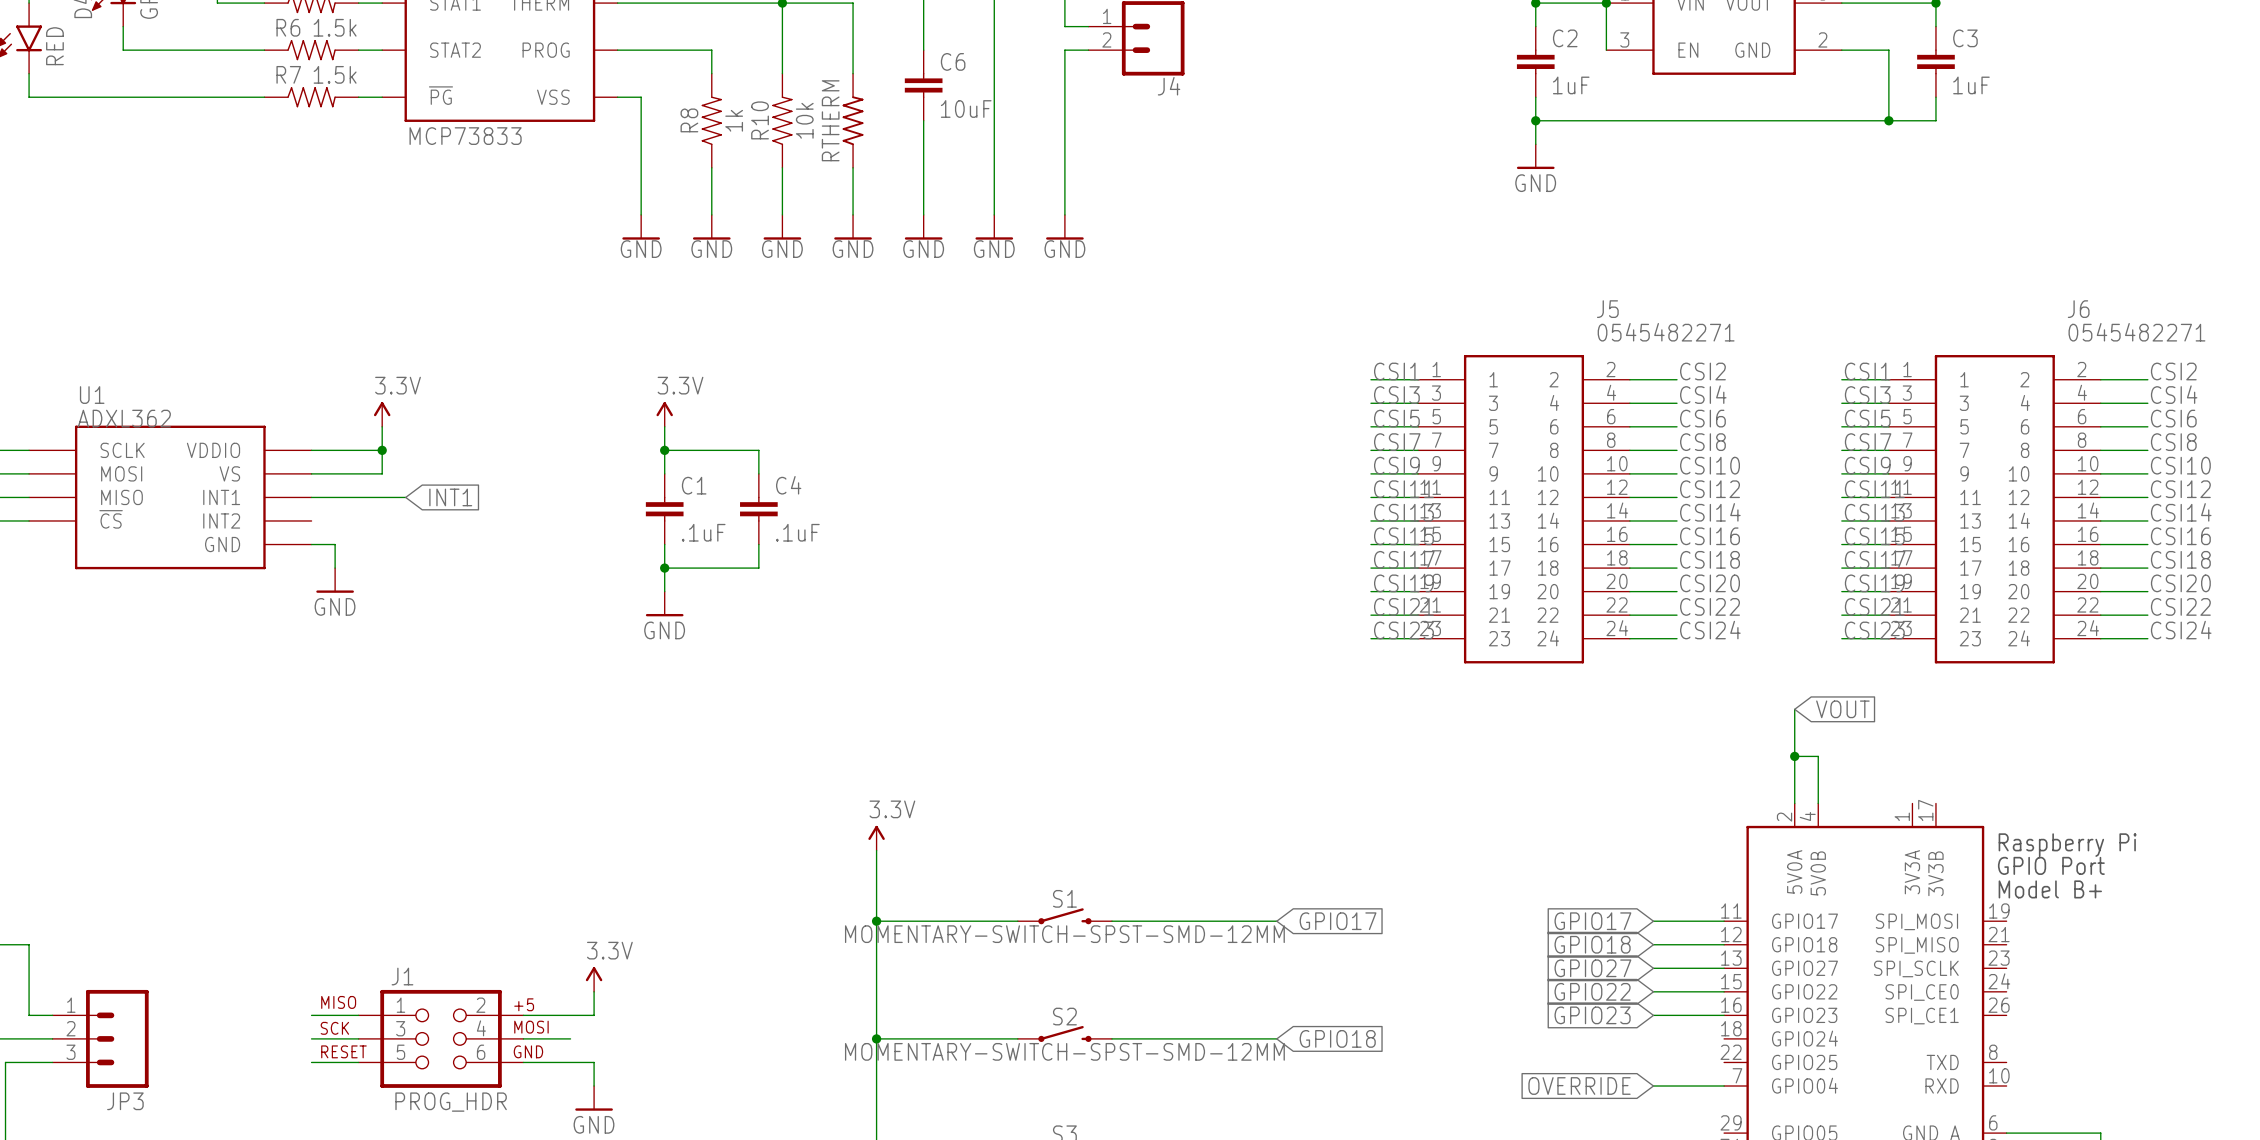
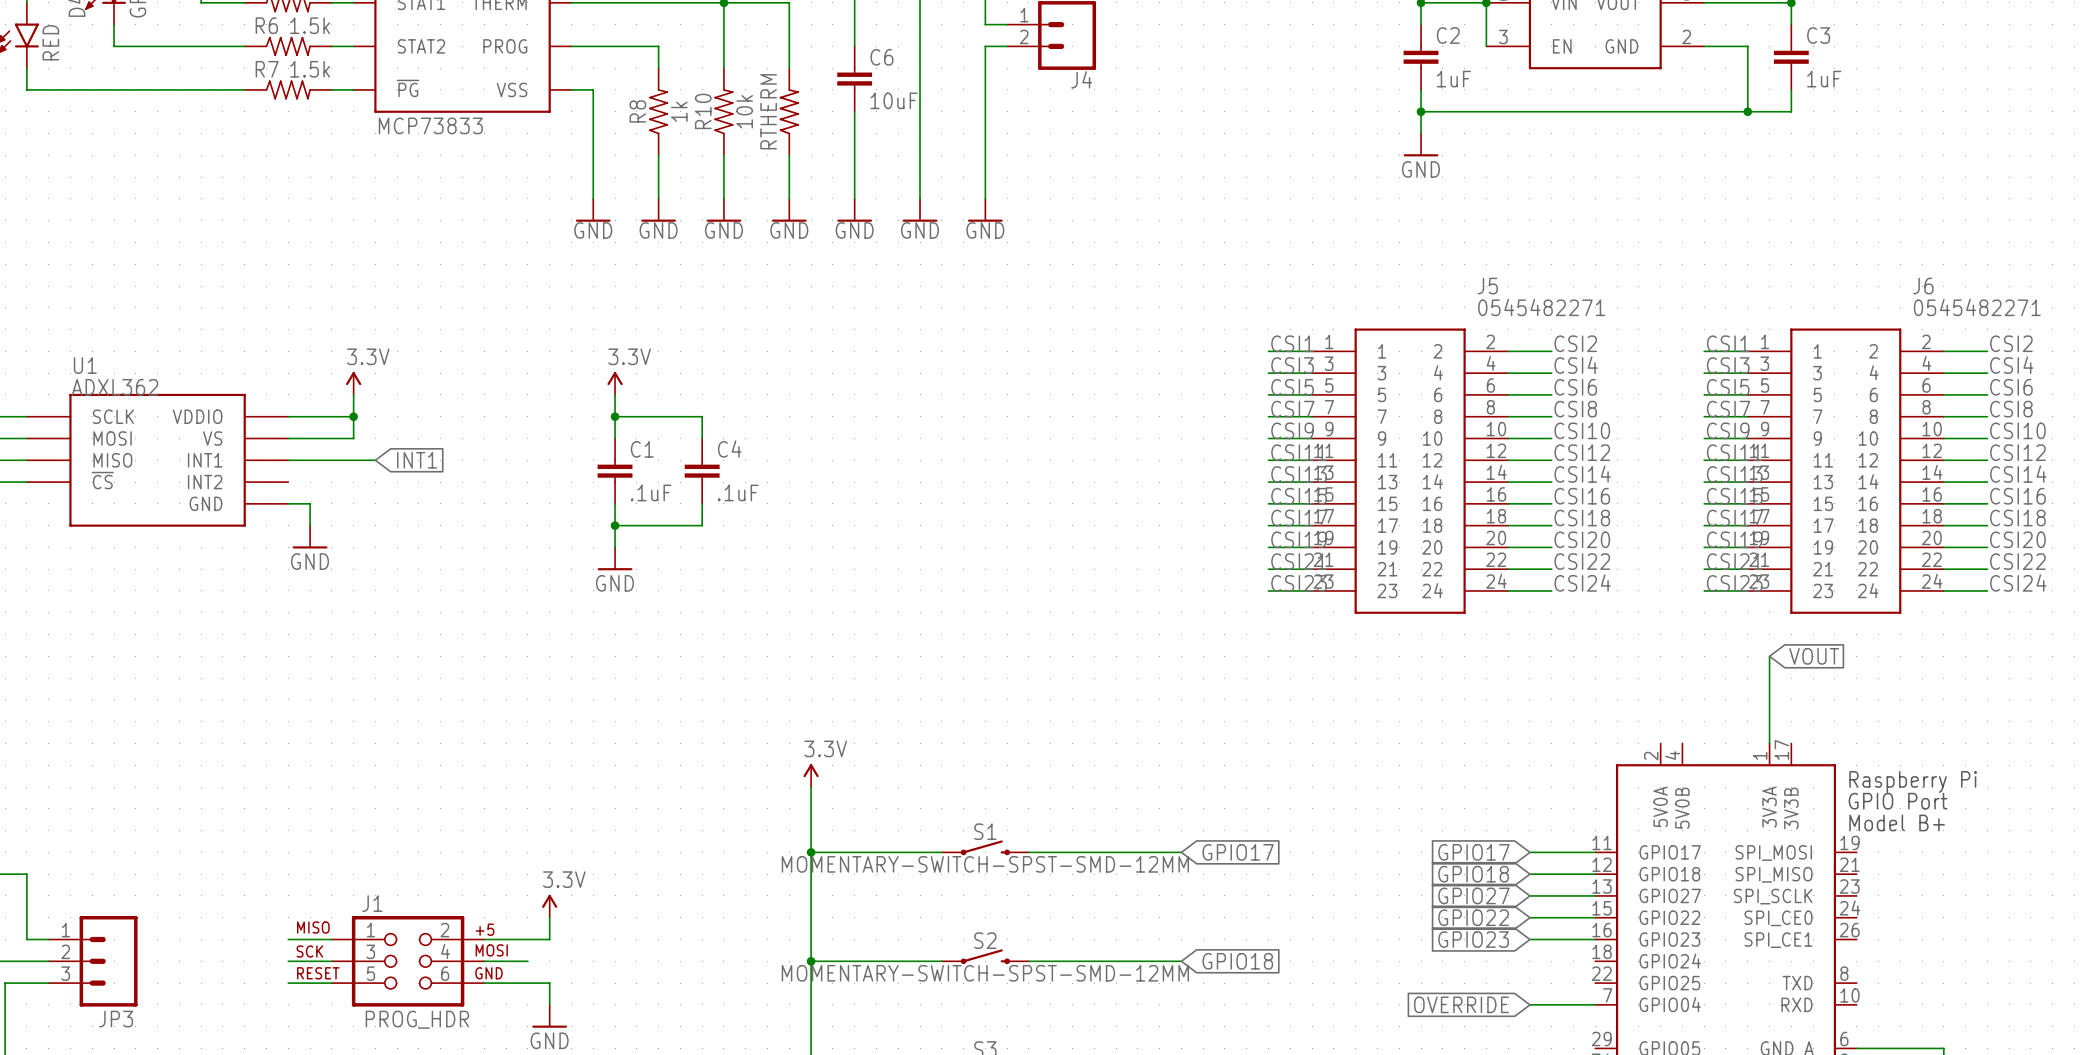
wire: (1794, 709) (1794, 803) -> (1769, 656) (1769, 743)
global label position: VOUT (1842, 709) -> VOUT (1814, 656)
wire: (1794, 756) (1818, 756) (1818, 803) -> none
junction: (1794, 756) -> none

